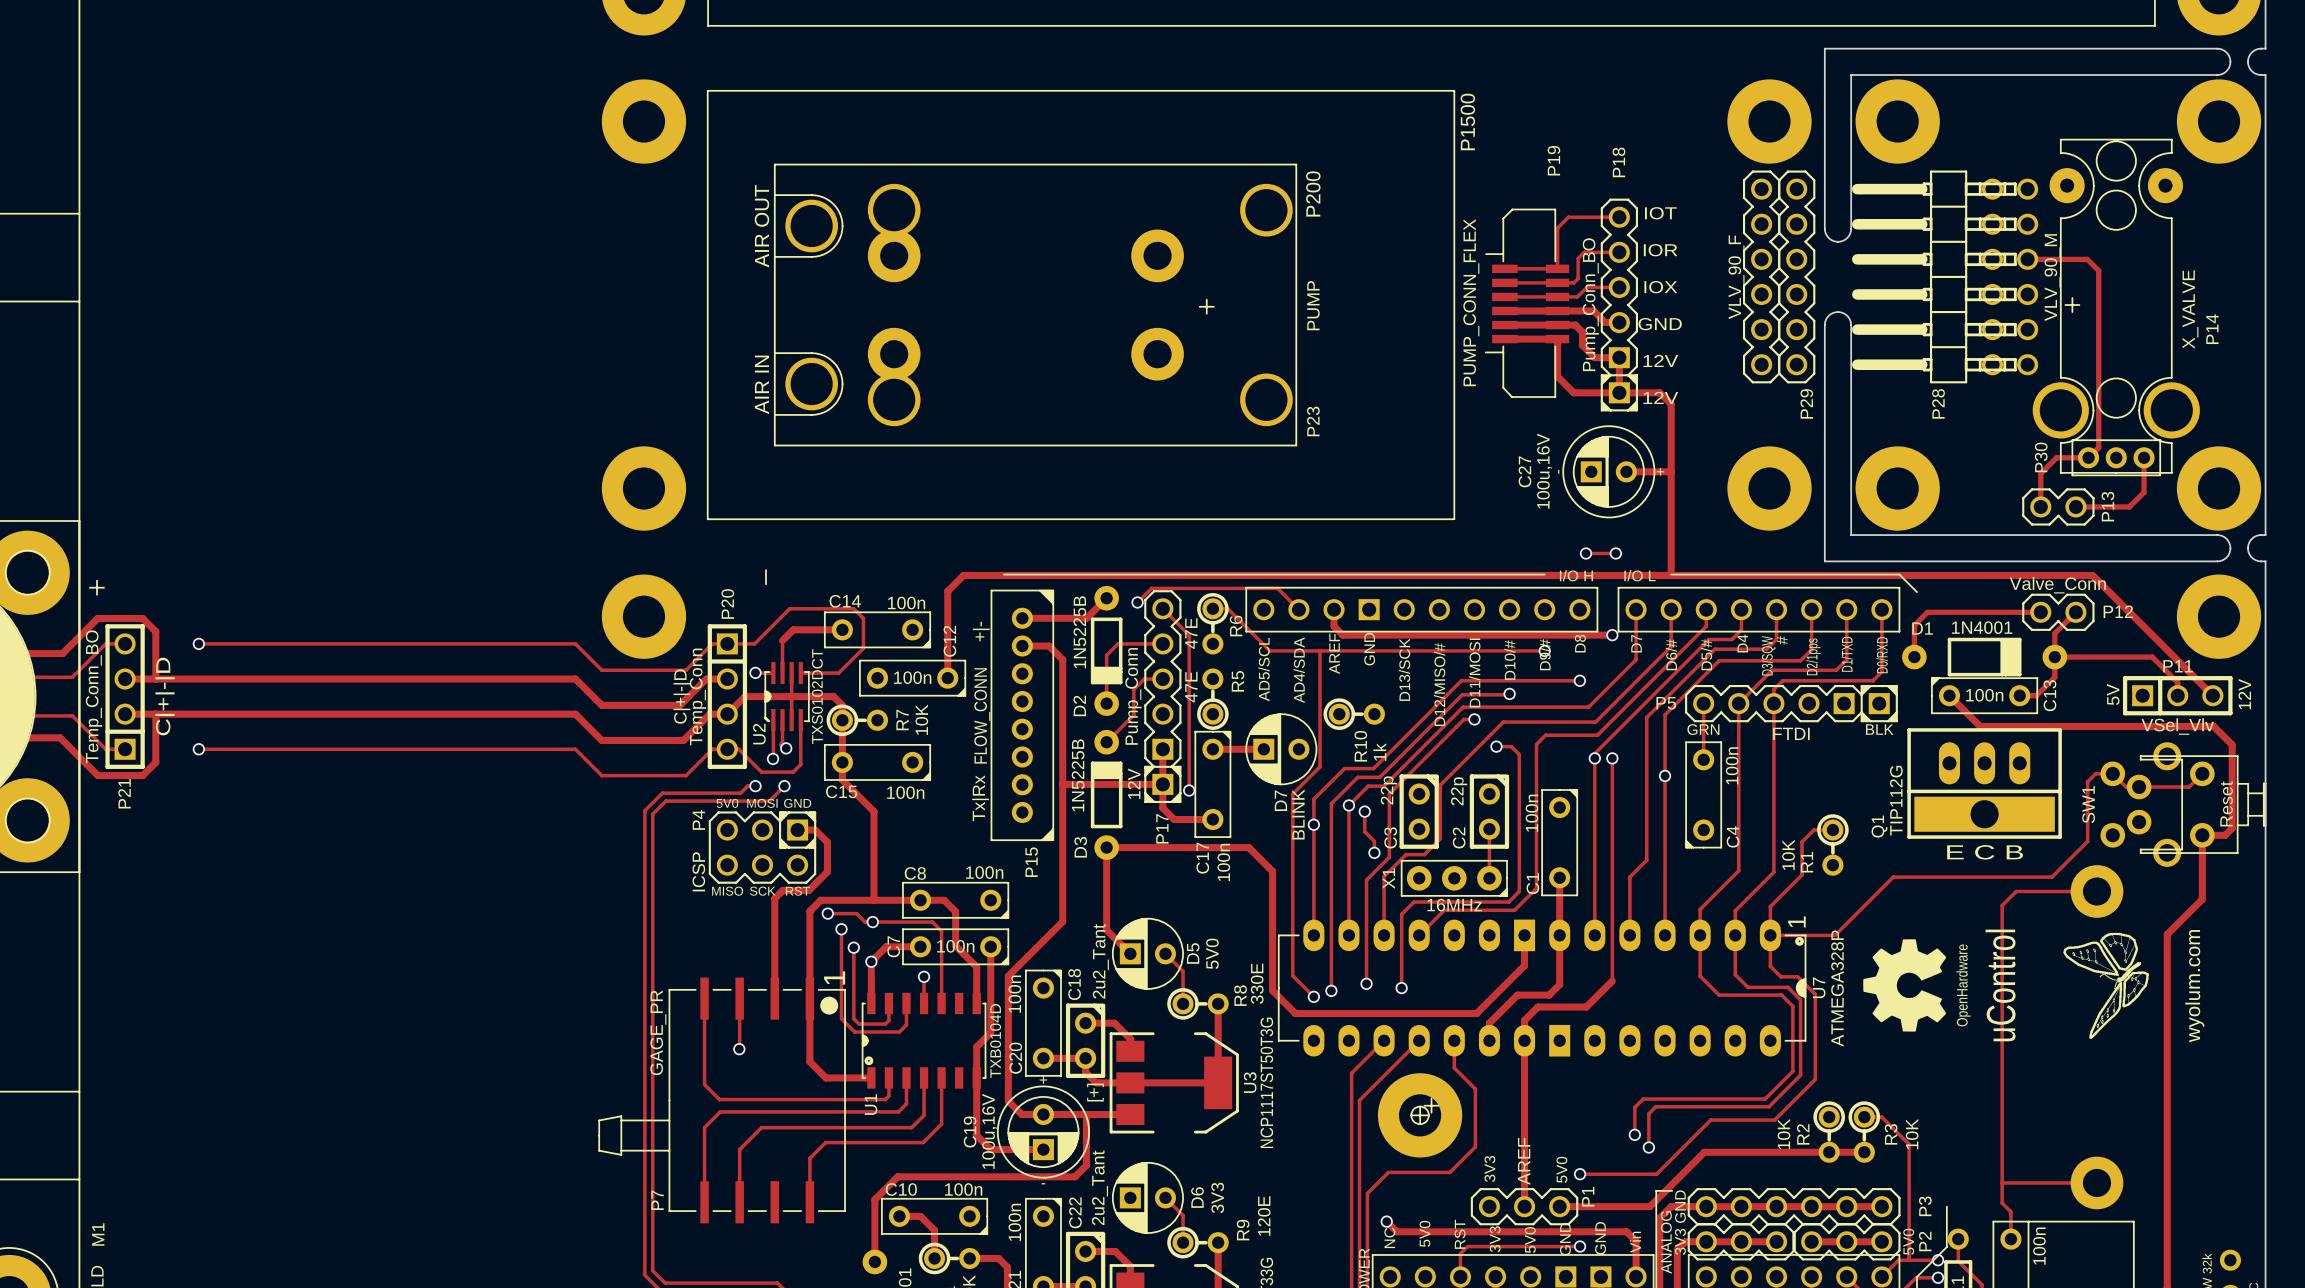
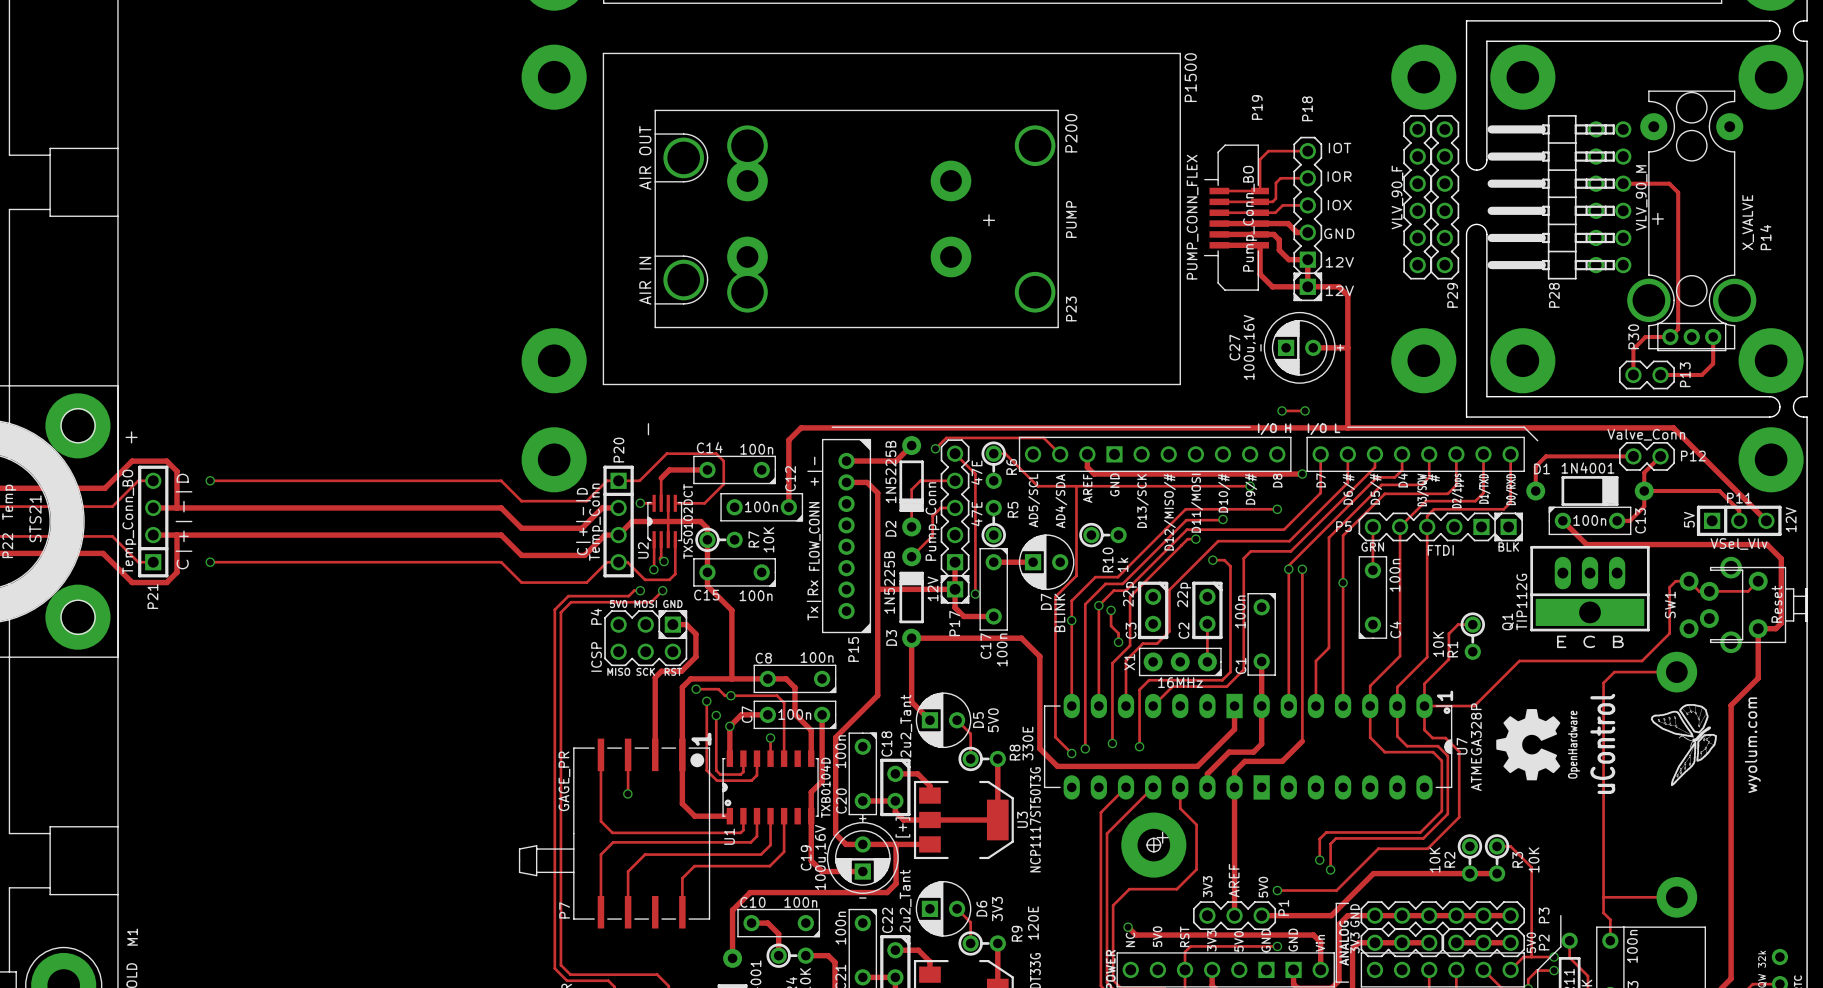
P18 value position: Pump_Conn_BO (1590, 304) -> Pump_Conn_BO (1250, 218)

